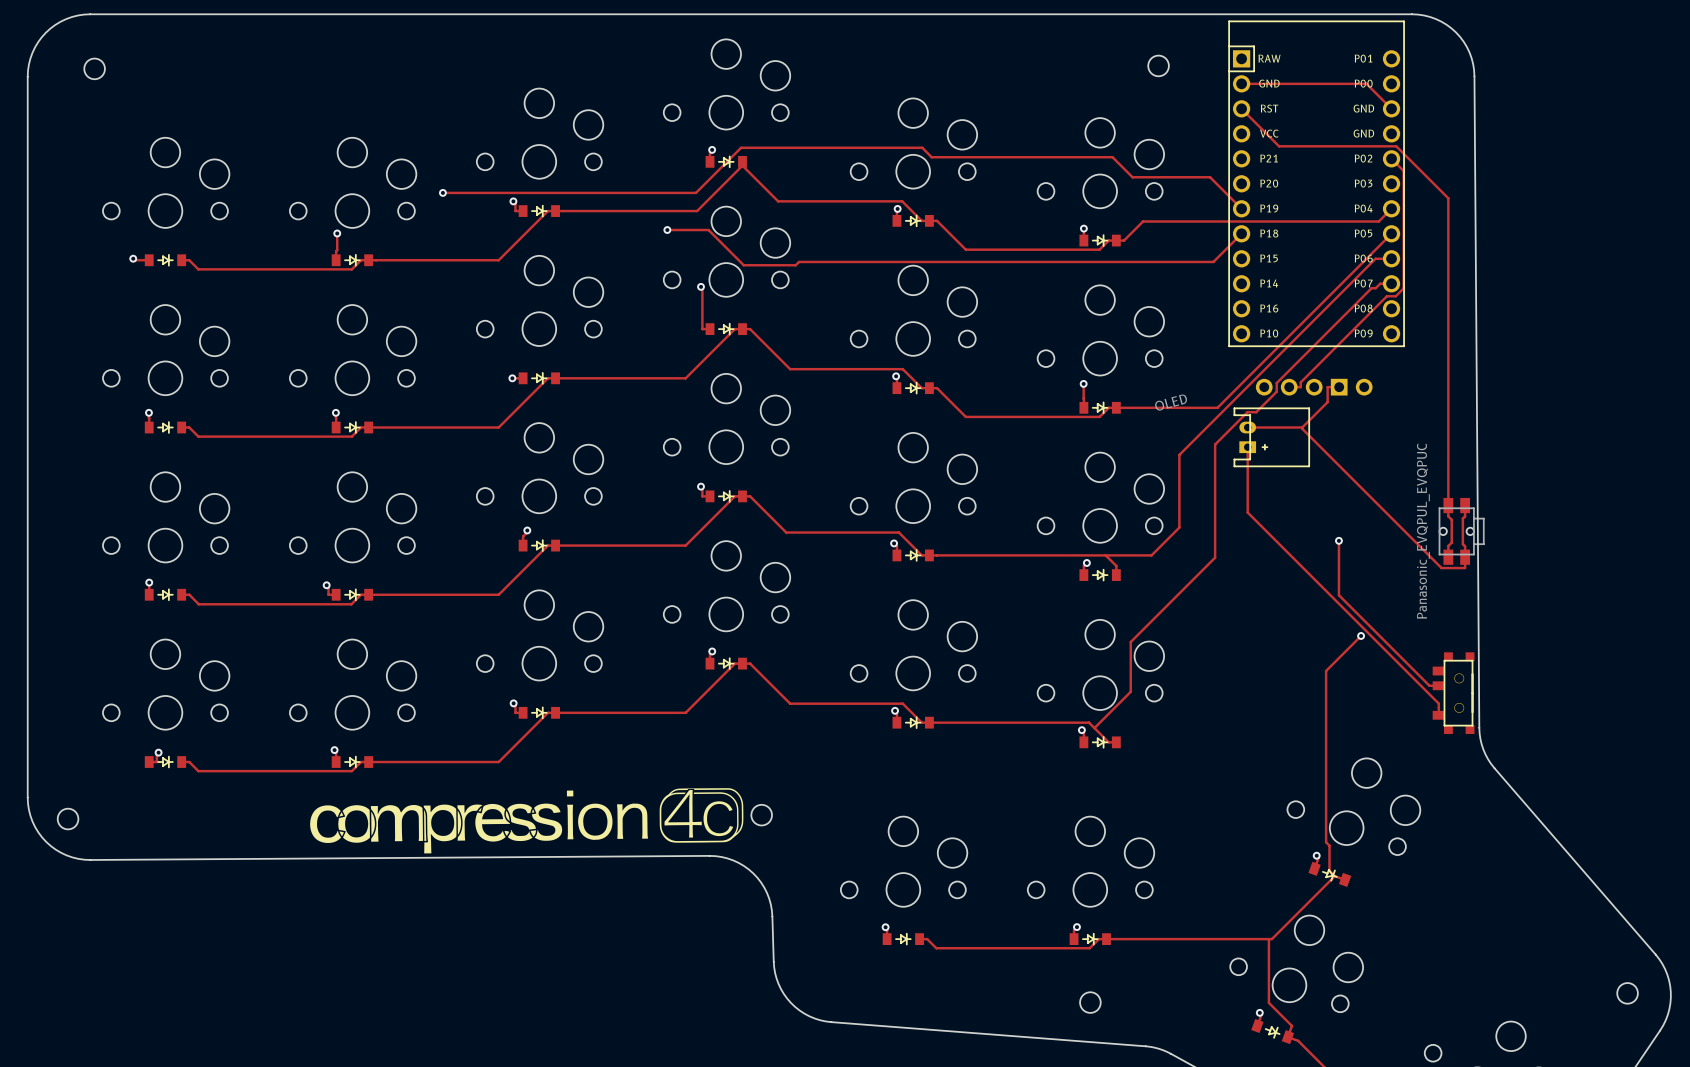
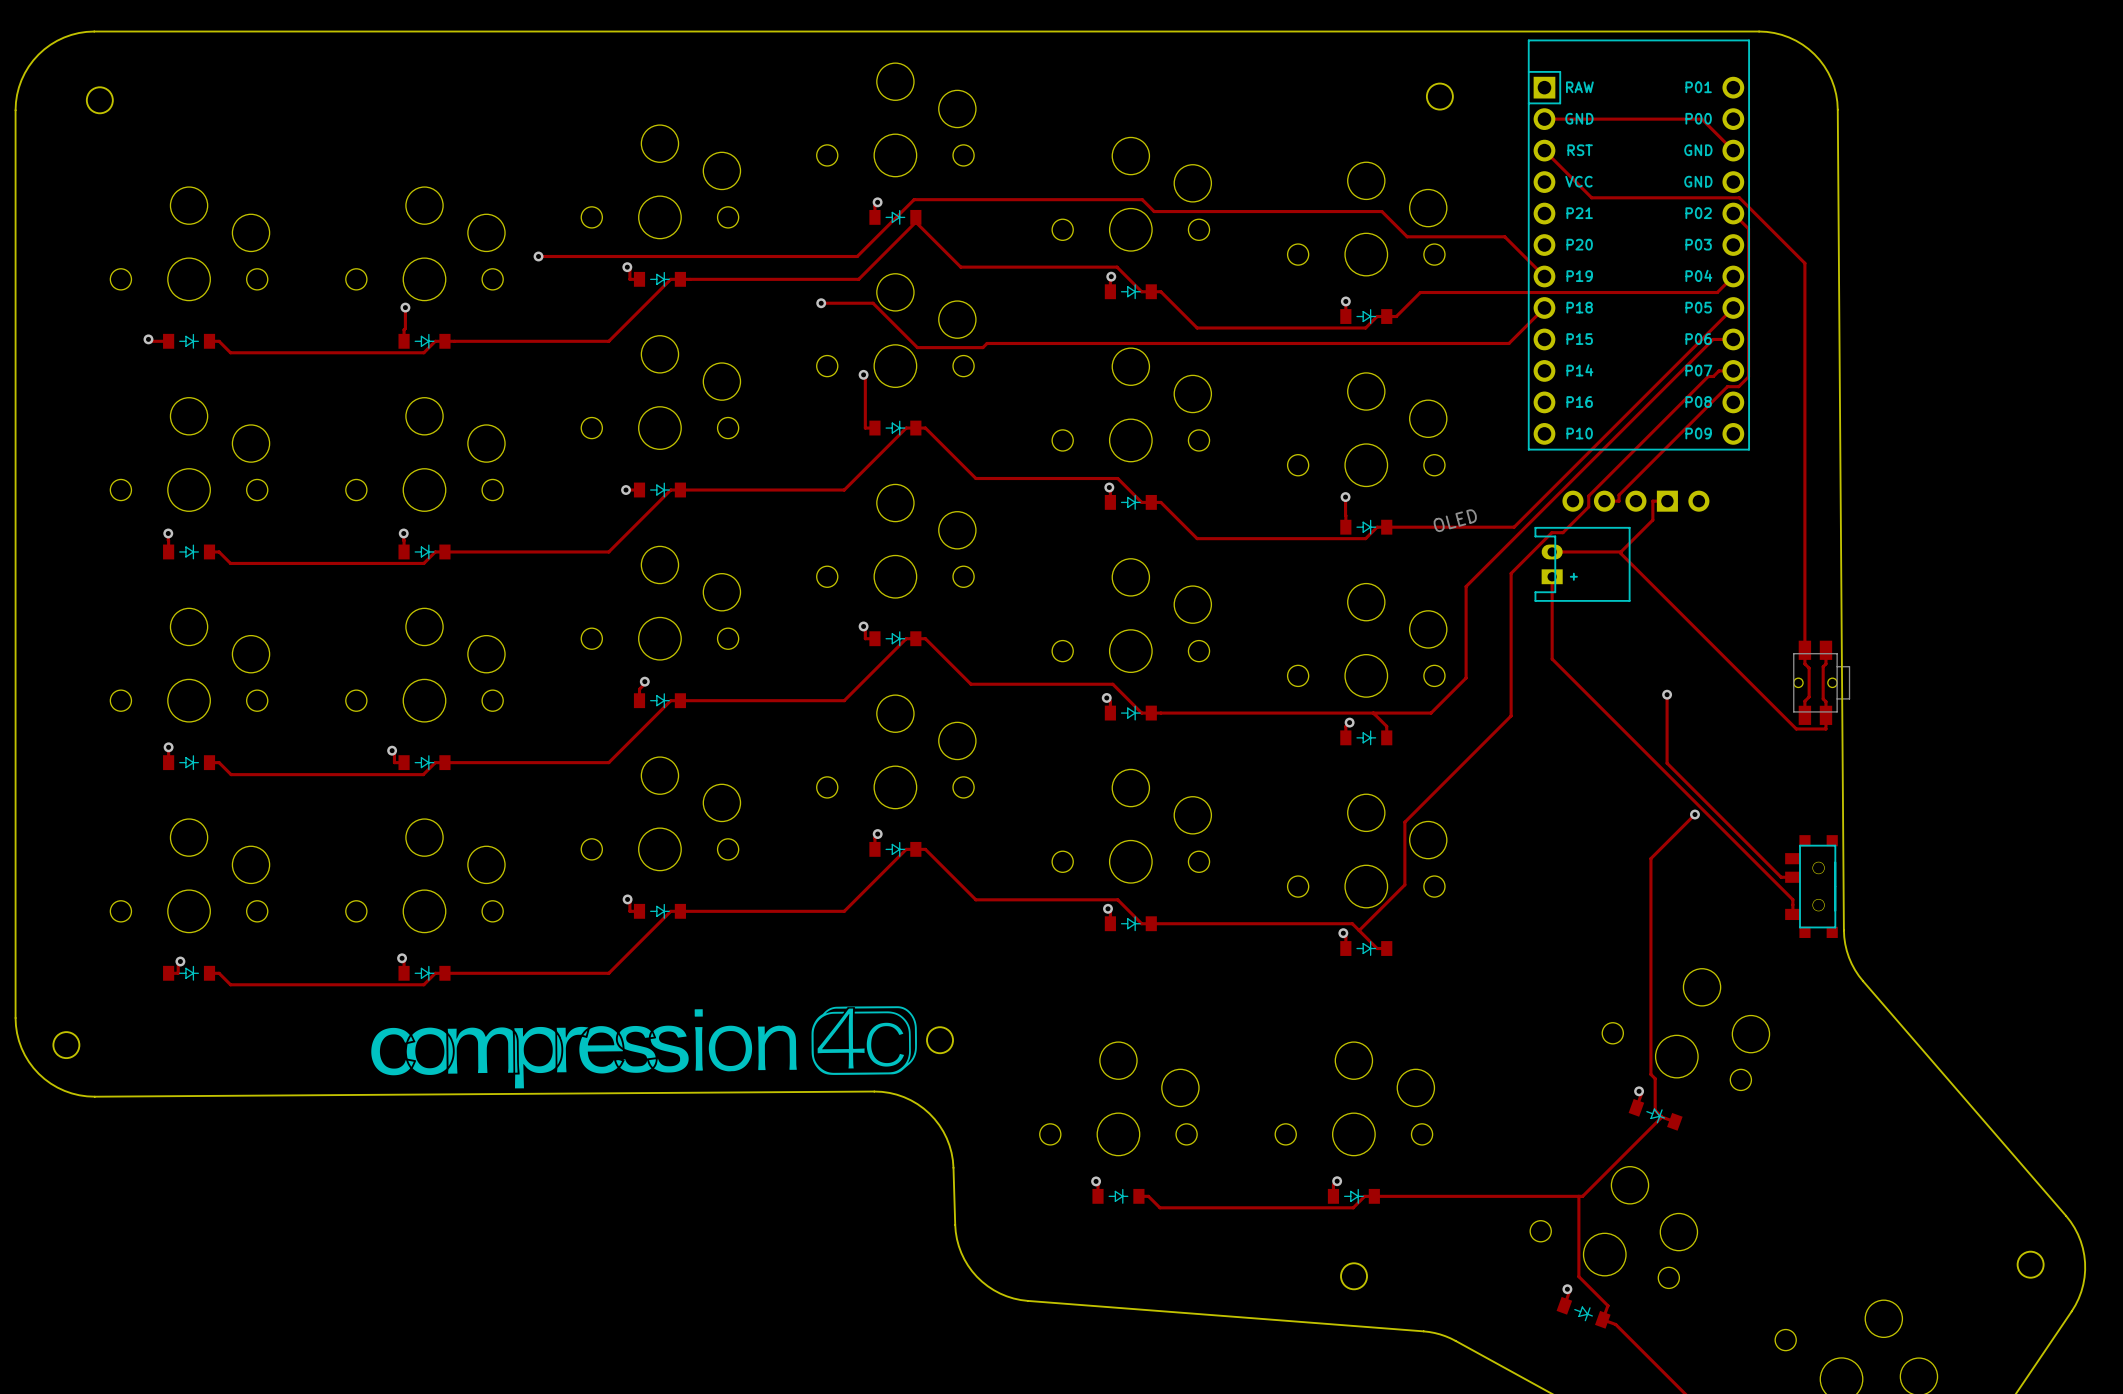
part value: Panasonic_EVQPUL_EVQPUC (1423, 531) -> none

